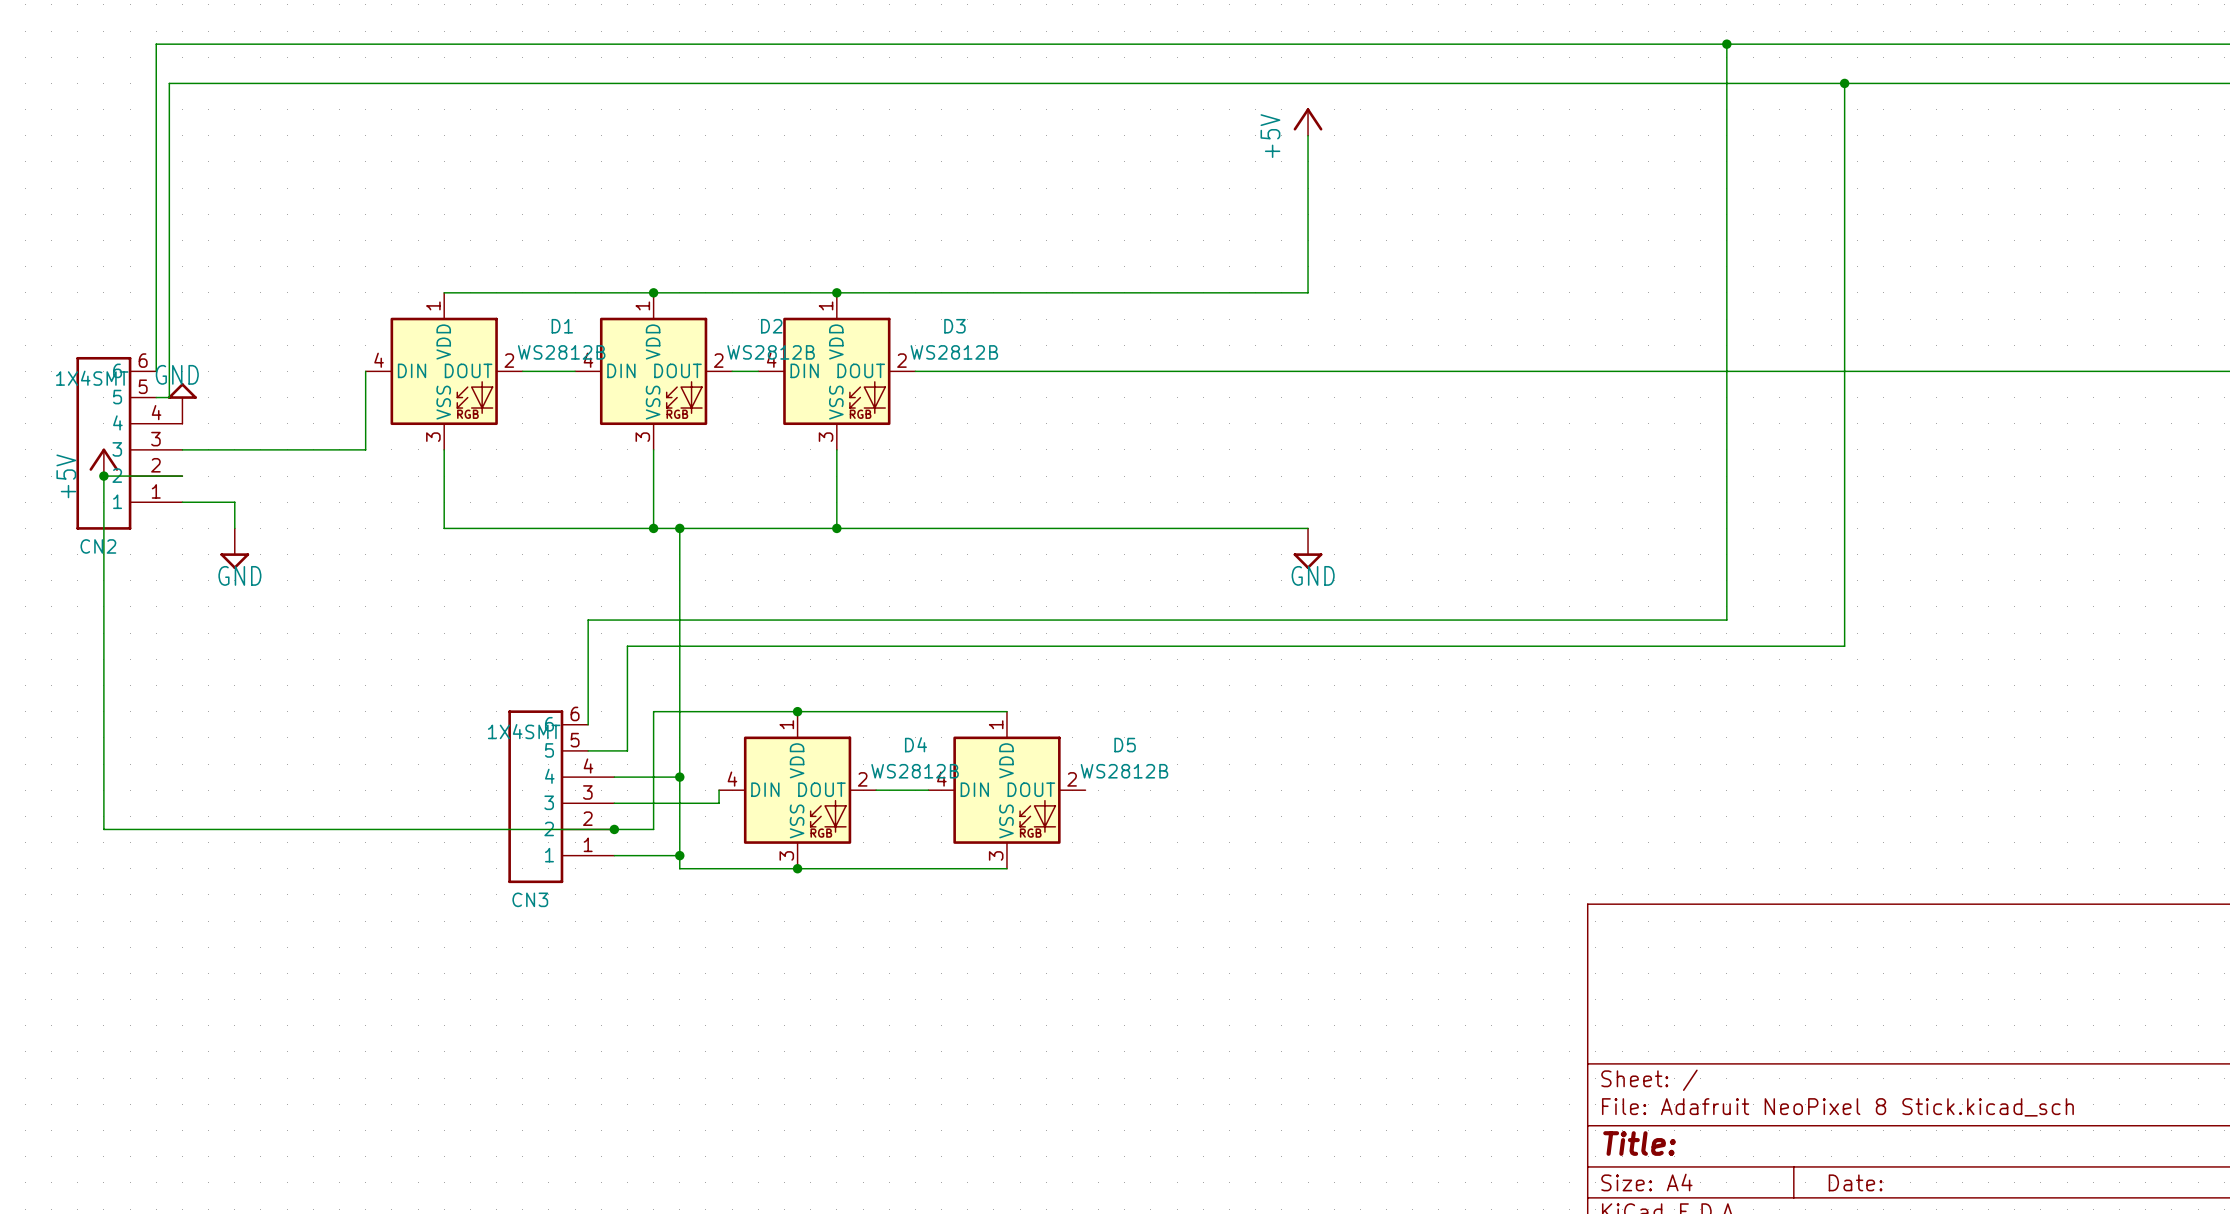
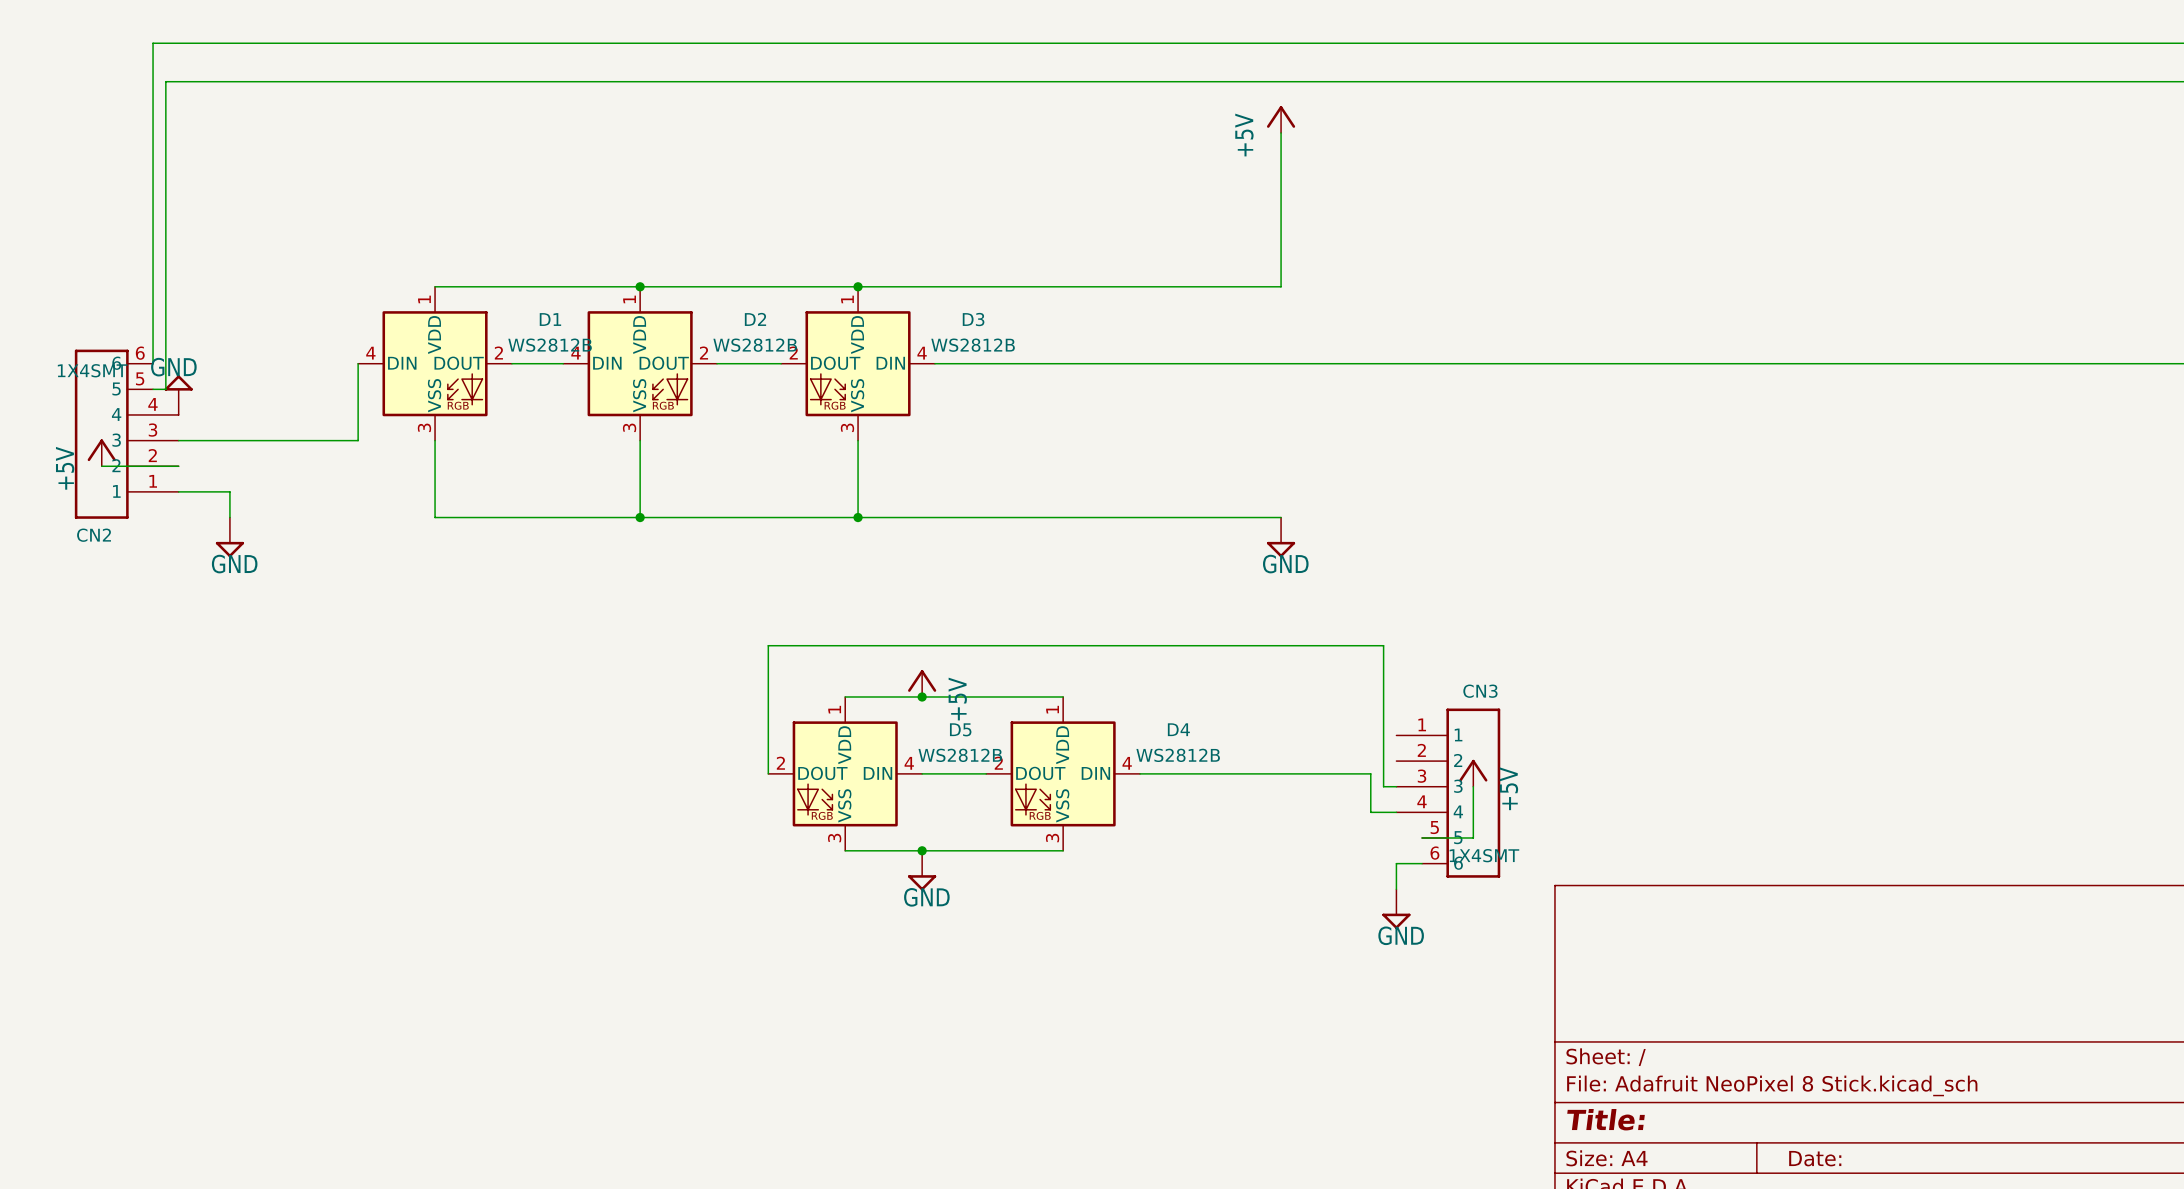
wire: (1726, 44) (1726, 620) (588, 620) (588, 724) -> none
junction: (1726, 44) -> none
wire: (1844, 83) (1844, 646) (627, 646) (627, 750) (588, 750) -> none
junction: (1844, 83) -> none
junction position: (836, 292) -> (858, 286)
D3 flip: as is (836, 371) -> left-right (858, 363)
wire: (836, 449) (836, 528) -> (858, 440) (858, 517)
wire: (103, 476) (103, 829) (653, 829) (653, 711) (863, 711) -> none
junction: (103, 476) -> none
wire: (679, 528) (679, 868) (863, 868) -> none
junction: (679, 528) -> none
junction position: (836, 528) -> (858, 517)
power symbol: none -> +5V (922, 683)
junction: (797, 711) -> none
junction: none -> (922, 696)
wire: none -> (986, 696) (1063, 696)
wire: (614, 777) (679, 777) -> none
junction: (679, 777) -> none
power symbol: none -> +5V (1473, 773)
wire: (719, 790) (719, 803) (614, 803) -> none
wire: none -> (768, 773) (768, 645) (1383, 645) (1383, 786) (1396, 786)
D4 flip: as is (797, 790) -> left-right (1063, 773)
D4 position: (797, 790) -> (1063, 773)
D5 flip: as is (1006, 790) -> left-right (845, 773)
D5 position: (1006, 790) -> (845, 773)
wire: none -> (1140, 773) (1370, 773) (1370, 812) (1396, 812)
CN3 rotation: 0° (535, 796) -> 180° (1473, 793)
CN3 position: (561, 796) -> (1448, 793)
wire: none -> (1473, 786) (1473, 837) (1422, 837)
junction: (614, 829) -> none
wire: (614, 855) (679, 855) -> none
junction: (679, 855) -> none
junction: (797, 868) -> none
junction: none -> (922, 850)
wire: none -> (986, 850) (1063, 850)
wire: none -> (1422, 863) (1396, 863) (1396, 889)
power symbol: none -> GND (922, 870)
power symbol: none -> GND (1396, 909)

